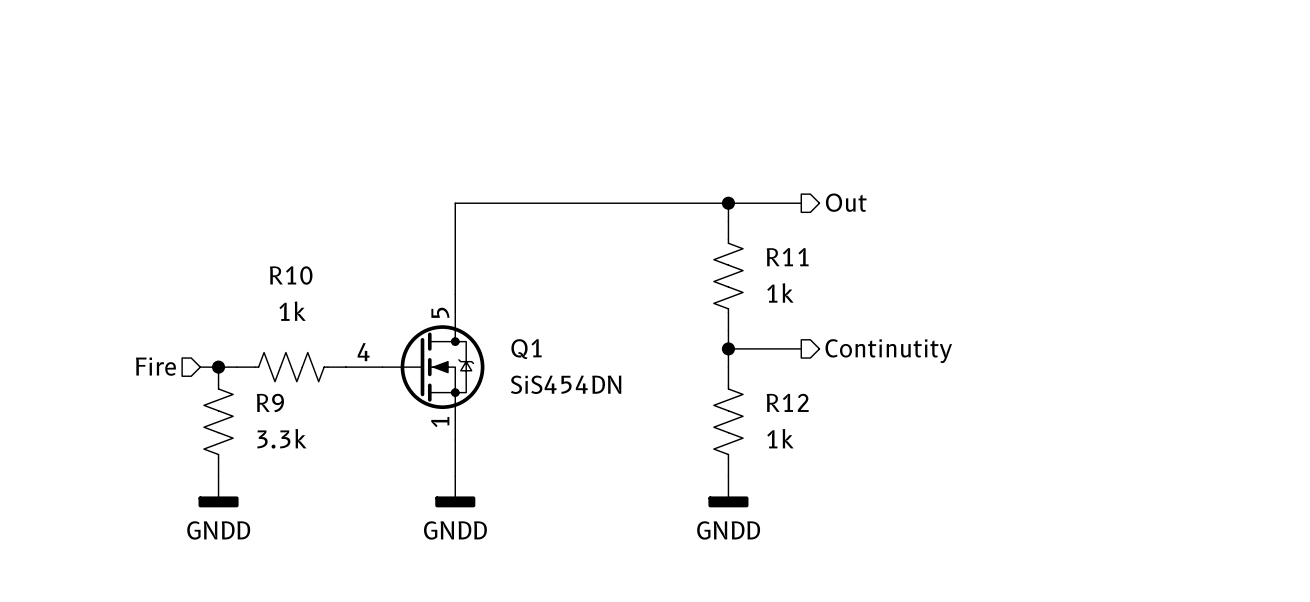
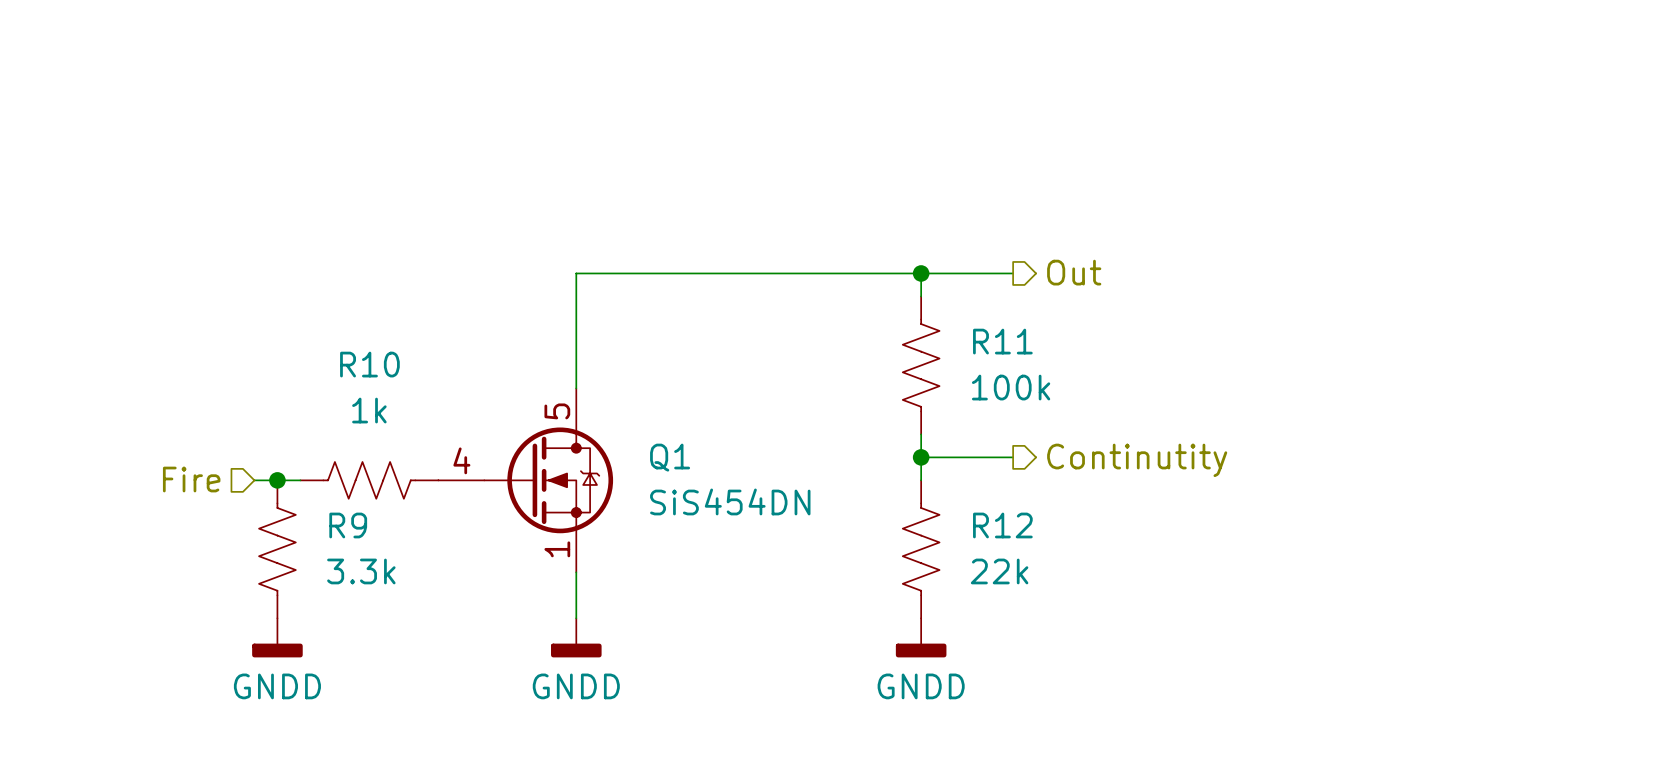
R11 value: 1k (780, 293) -> 100k (1011, 387)
R12 value: 1k (780, 438) -> 22k (999, 571)

